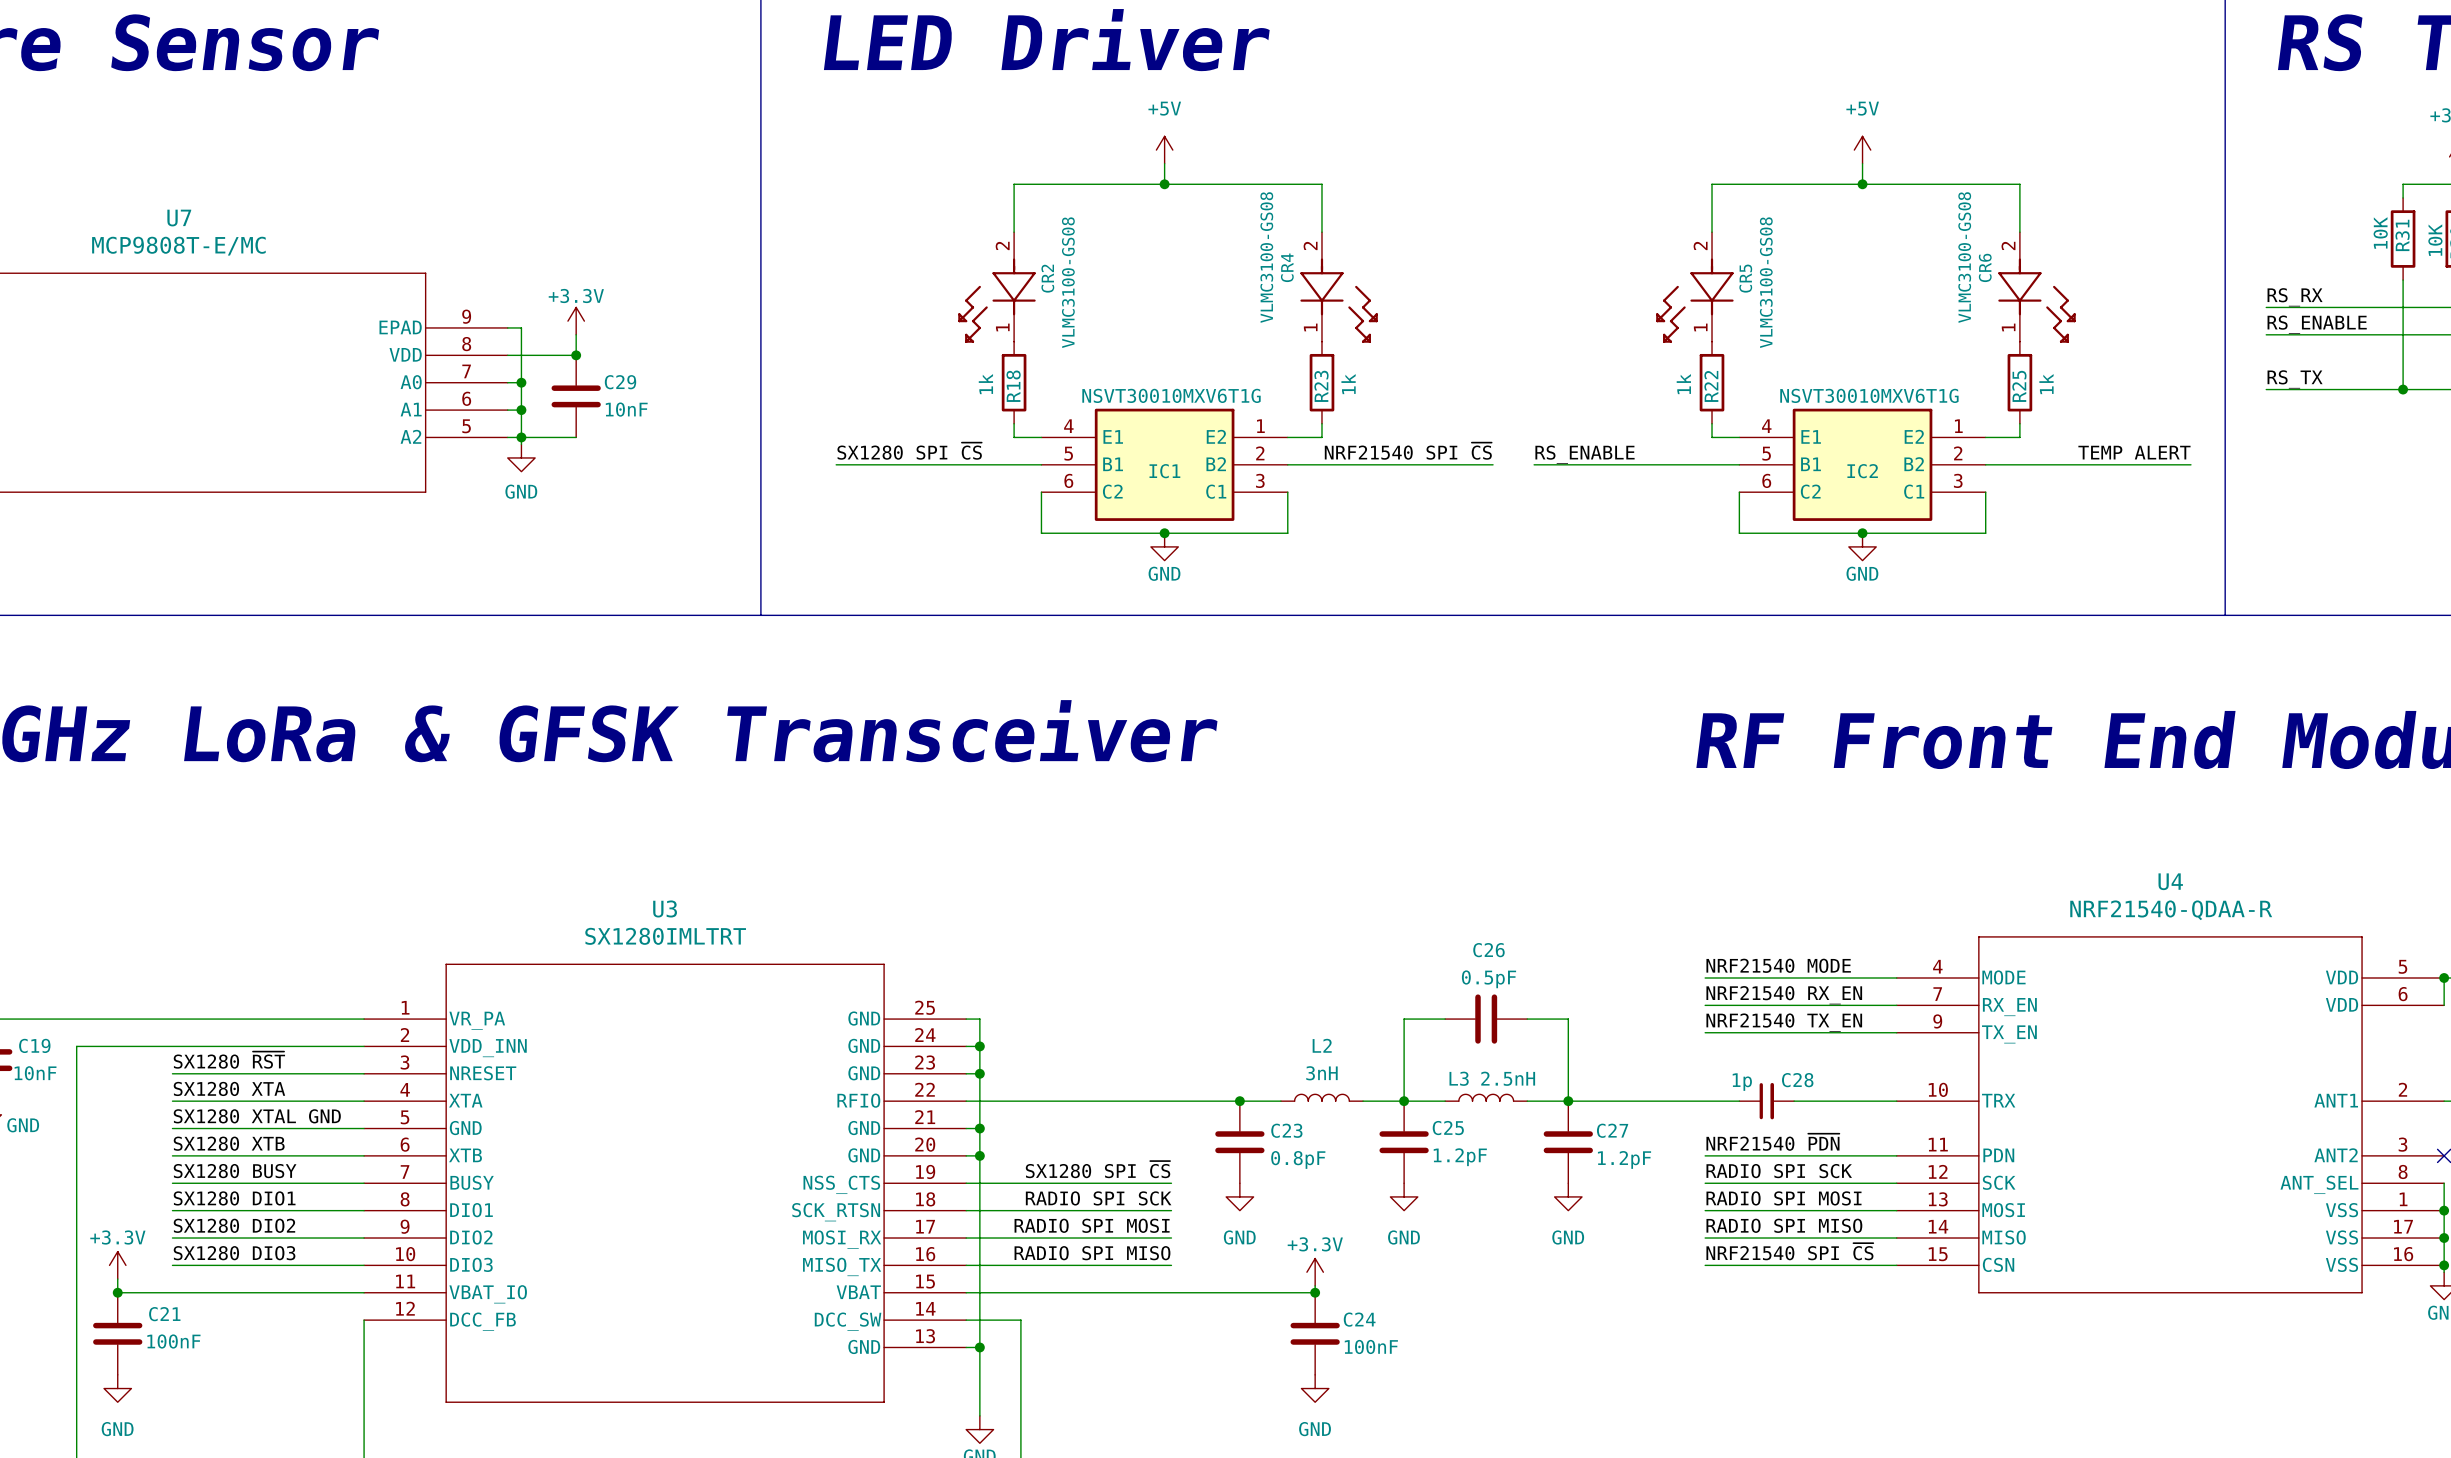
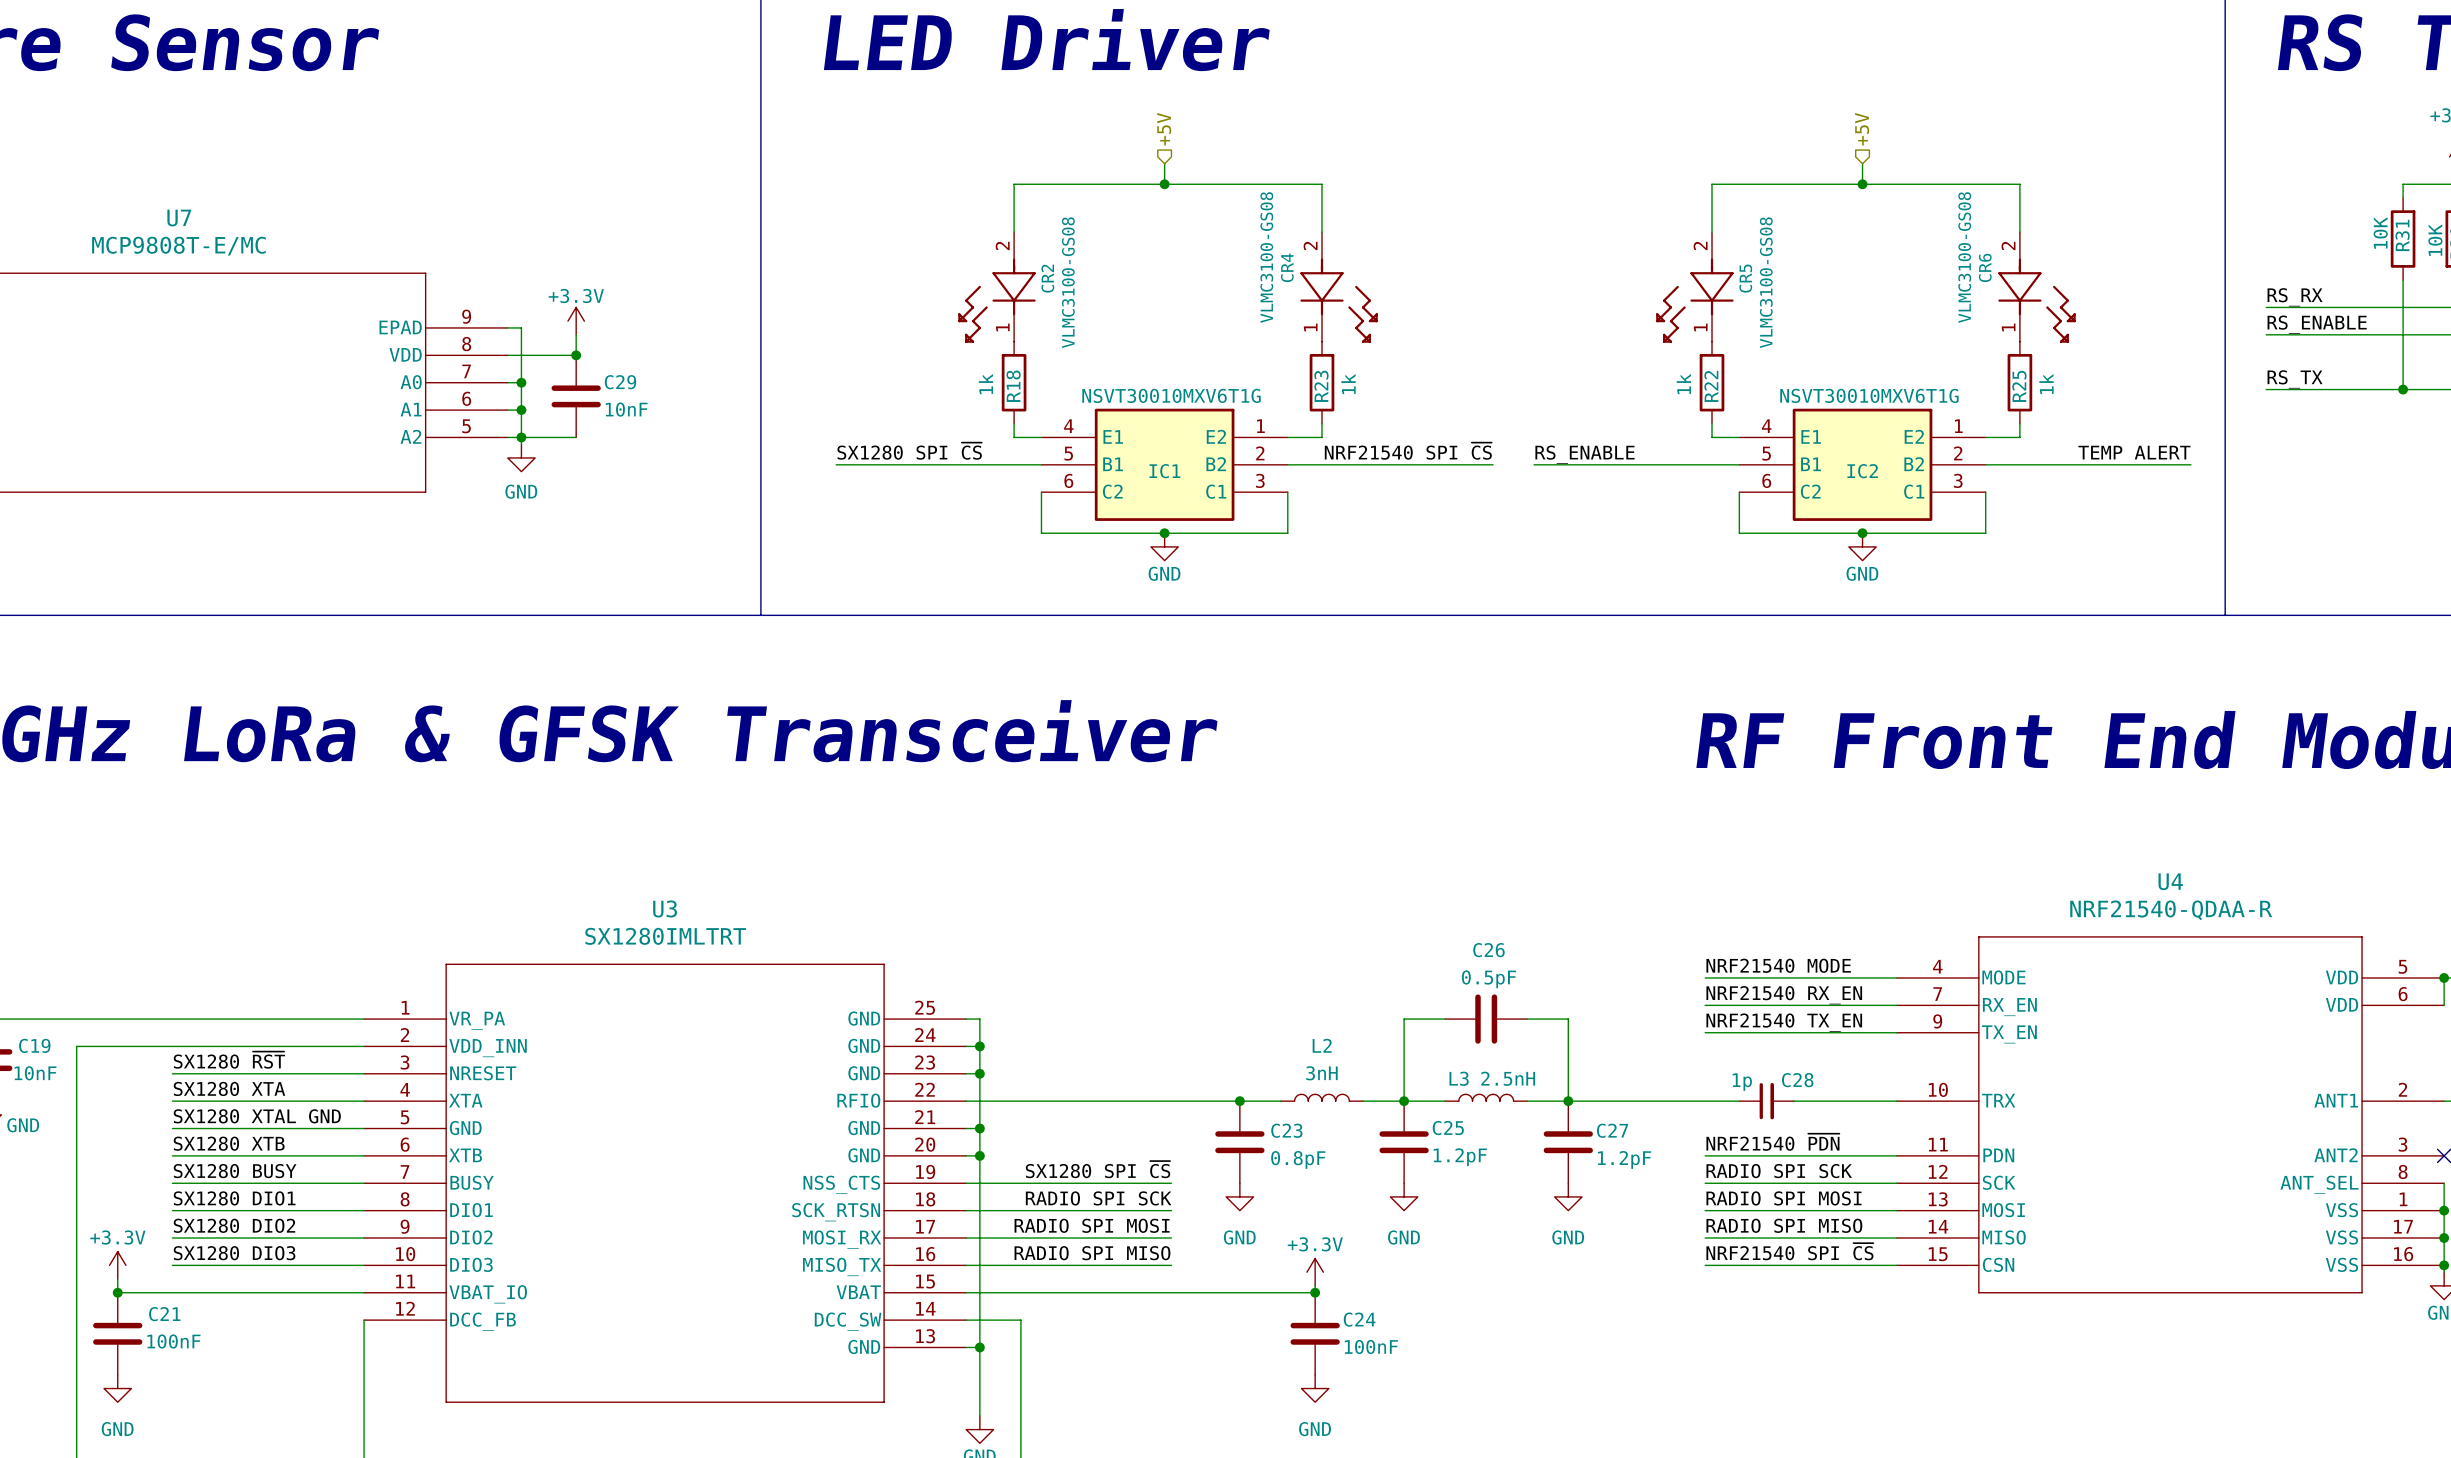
hierarchical label: none -> +5V (1164, 129)
hierarchical label: none -> +5V (1862, 129)
power symbol: +5V (1164, 150) -> none
power symbol: +5V (1862, 150) -> none

